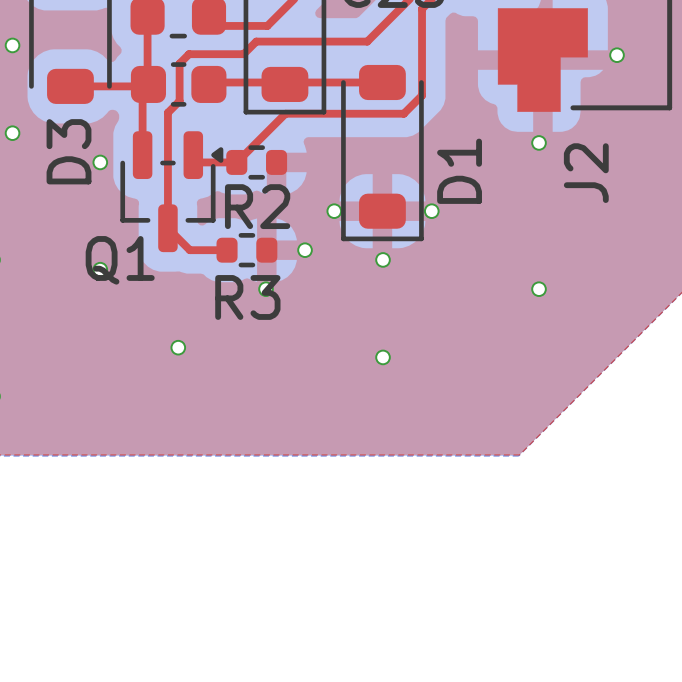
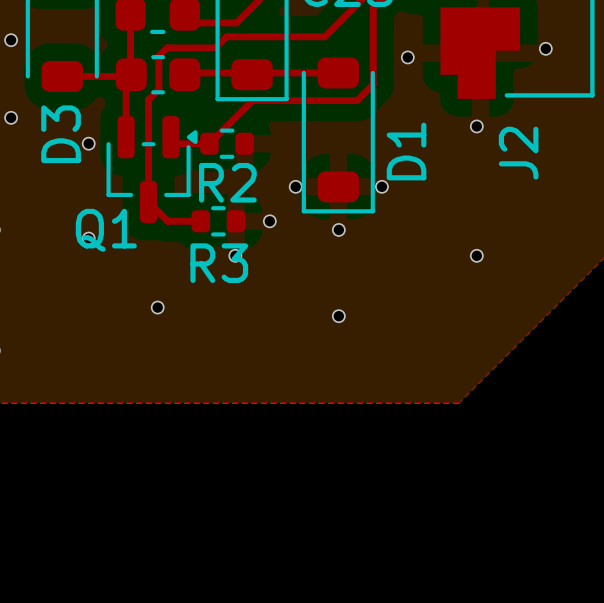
via: none -> (407, 57)

